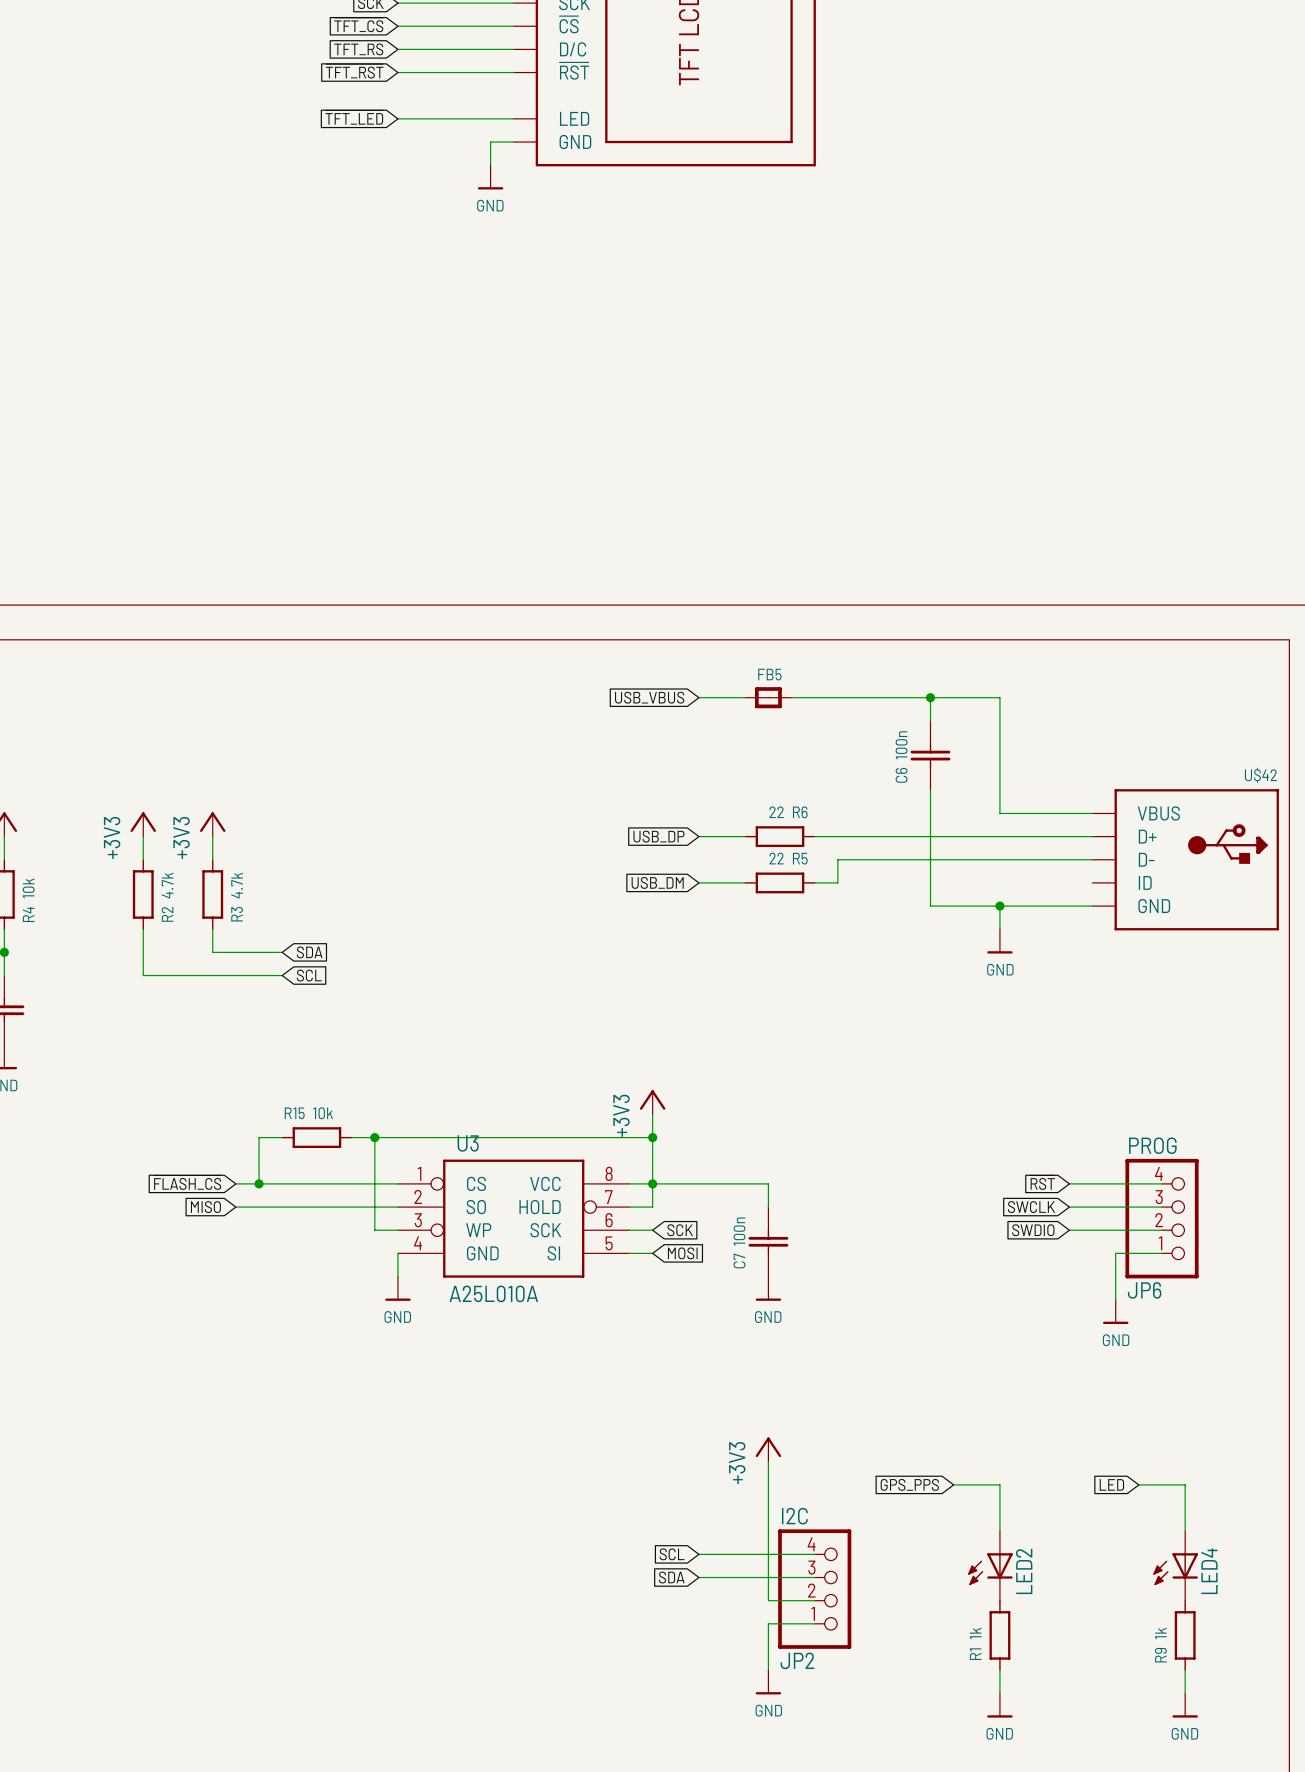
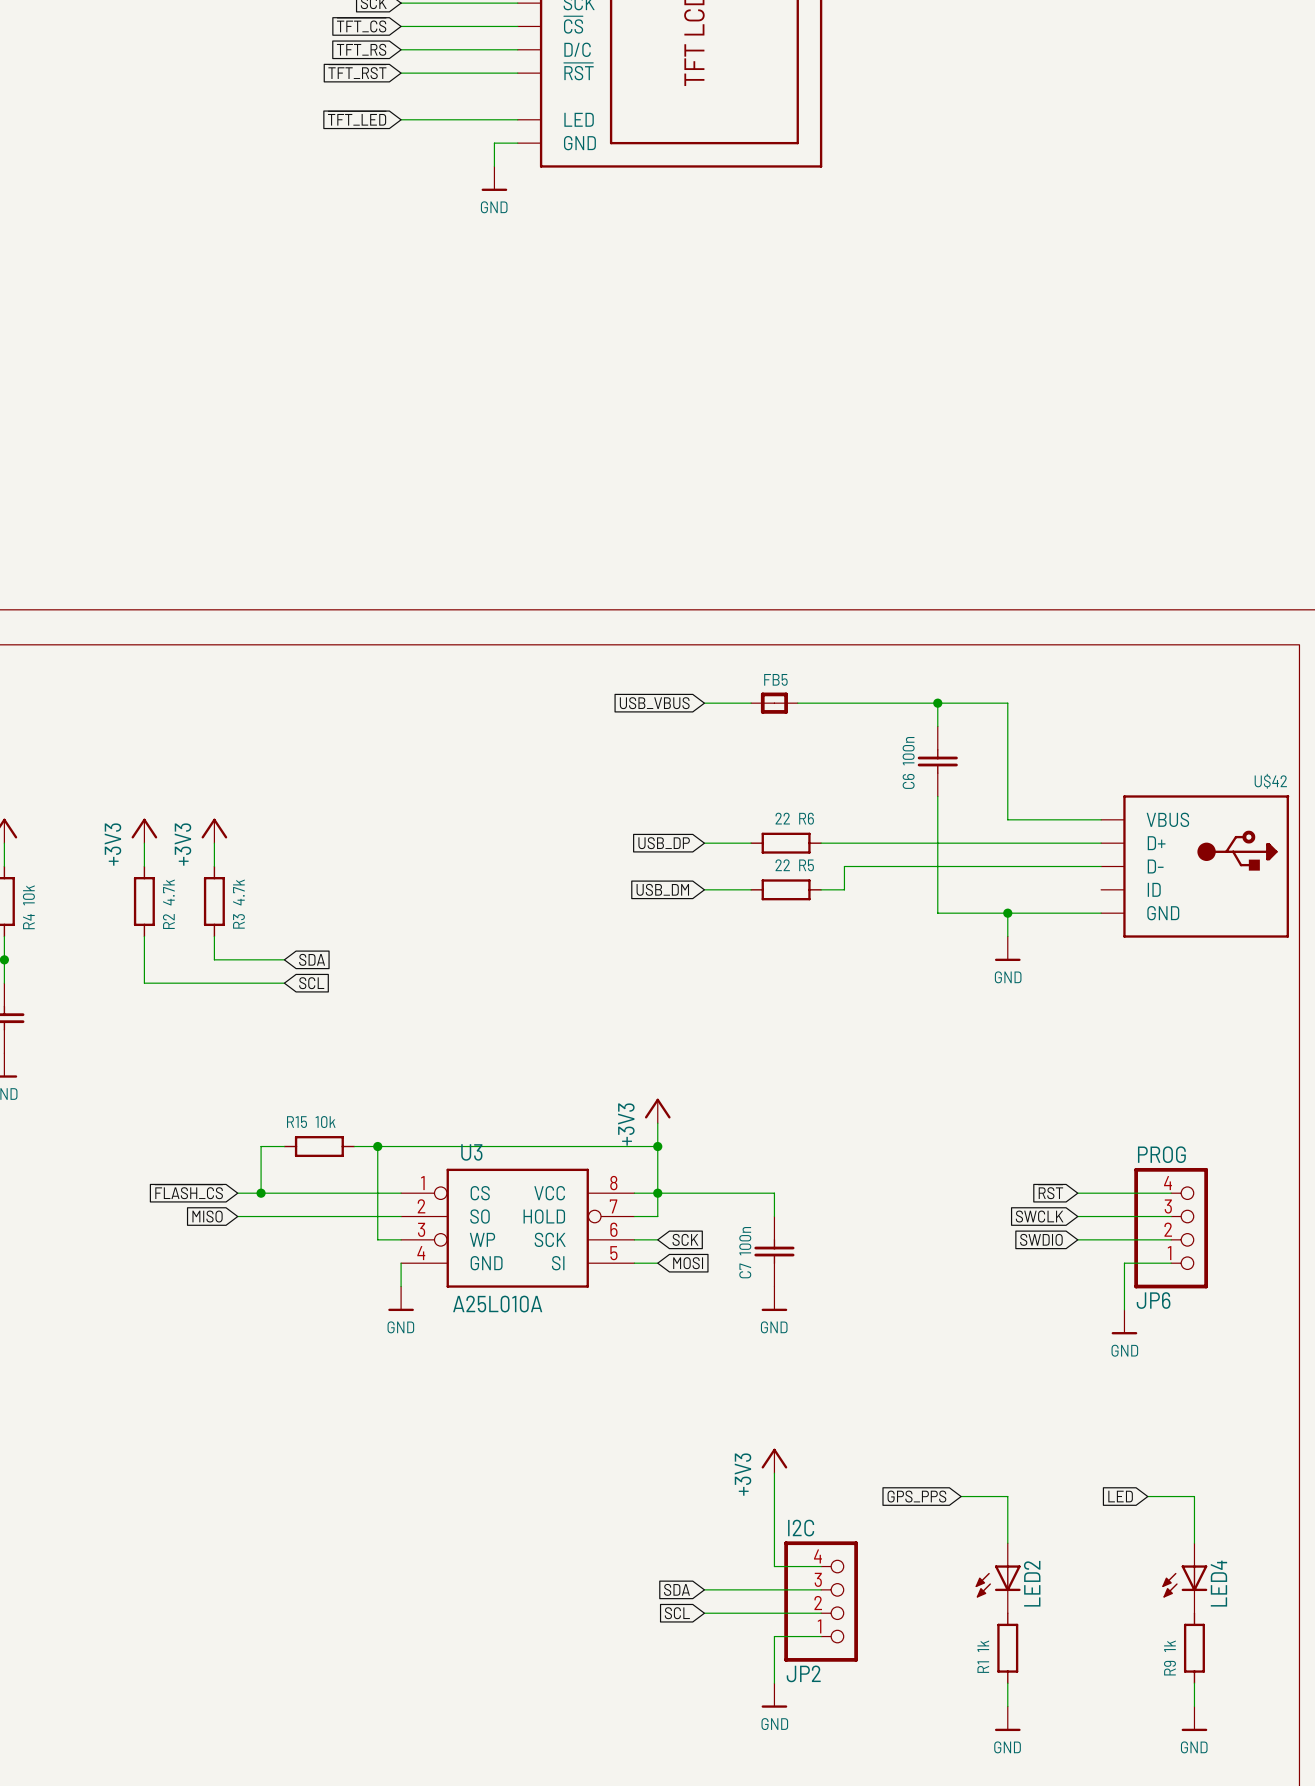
global label position: SCL (672, 1554) -> SCL (677, 1613)
wire: (698, 1554) (768, 1554) (768, 1600) -> (704, 1613) (774, 1613)

